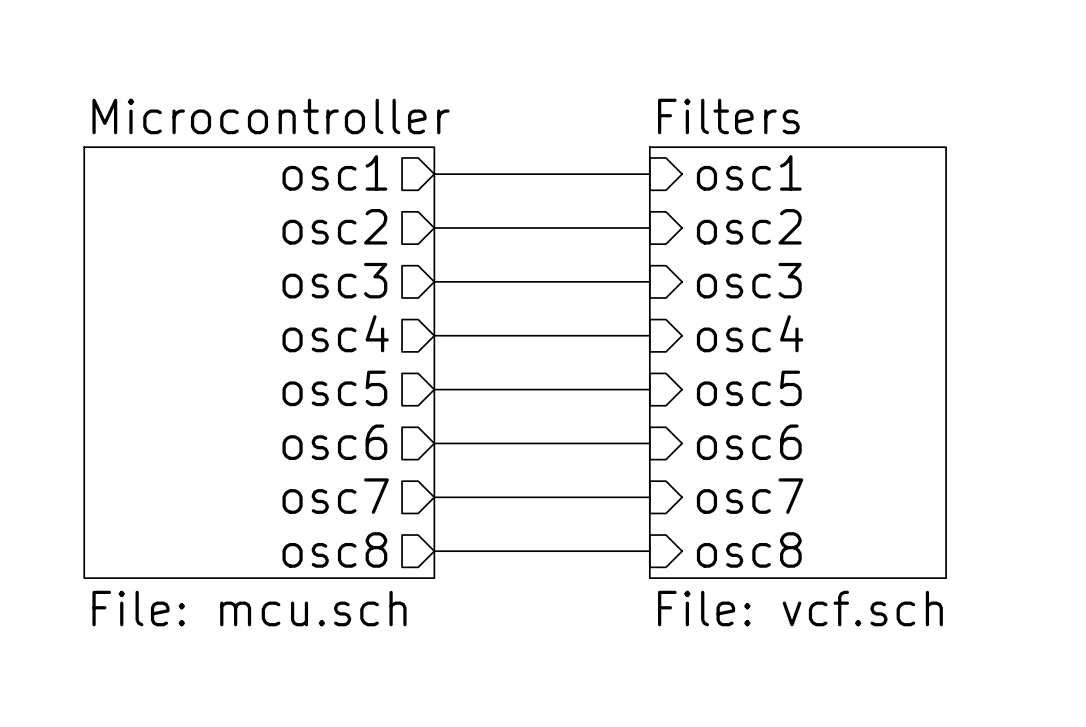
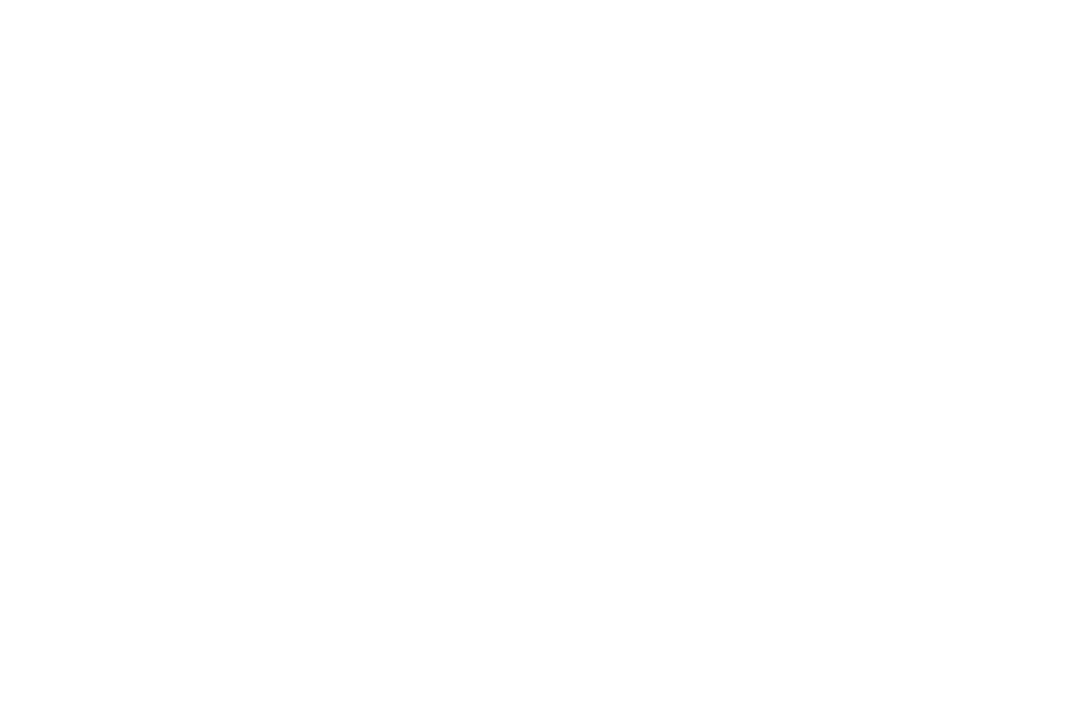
sheet pin: osc1 (334, 172) -> none
sheet pin: osc1 (749, 172) -> none
wire: (434, 174) (649, 174) -> none
sheet pin: osc2 (334, 226) -> none
sheet pin: osc2 (749, 226) -> none
wire: (434, 227) (649, 227) -> none
sheet pin: osc3 (334, 280) -> none
sheet pin: osc3 (749, 280) -> none
wire: (434, 281) (649, 281) -> none
sheet pin: osc4 (335, 333) -> none
sheet pin: osc4 (750, 333) -> none
wire: (434, 335) (649, 335) -> none
sheet Microcontroller: File: mcu.sch (259, 362) -> none
sheet Filters: File: vcf.sch (797, 362) -> none
sheet pin: osc5 (334, 388) -> none
sheet pin: osc5 (749, 388) -> none
wire: (434, 389) (649, 389) -> none
sheet pin: osc6 (334, 442) -> none
sheet pin: osc6 (749, 442) -> none
wire: (434, 443) (649, 443) -> none
sheet pin: osc7 (335, 496) -> none
sheet pin: osc7 (750, 496) -> none
wire: (434, 497) (649, 497) -> none
sheet pin: osc8 (334, 549) -> none
sheet pin: osc8 (749, 549) -> none
wire: (434, 551) (649, 551) -> none

